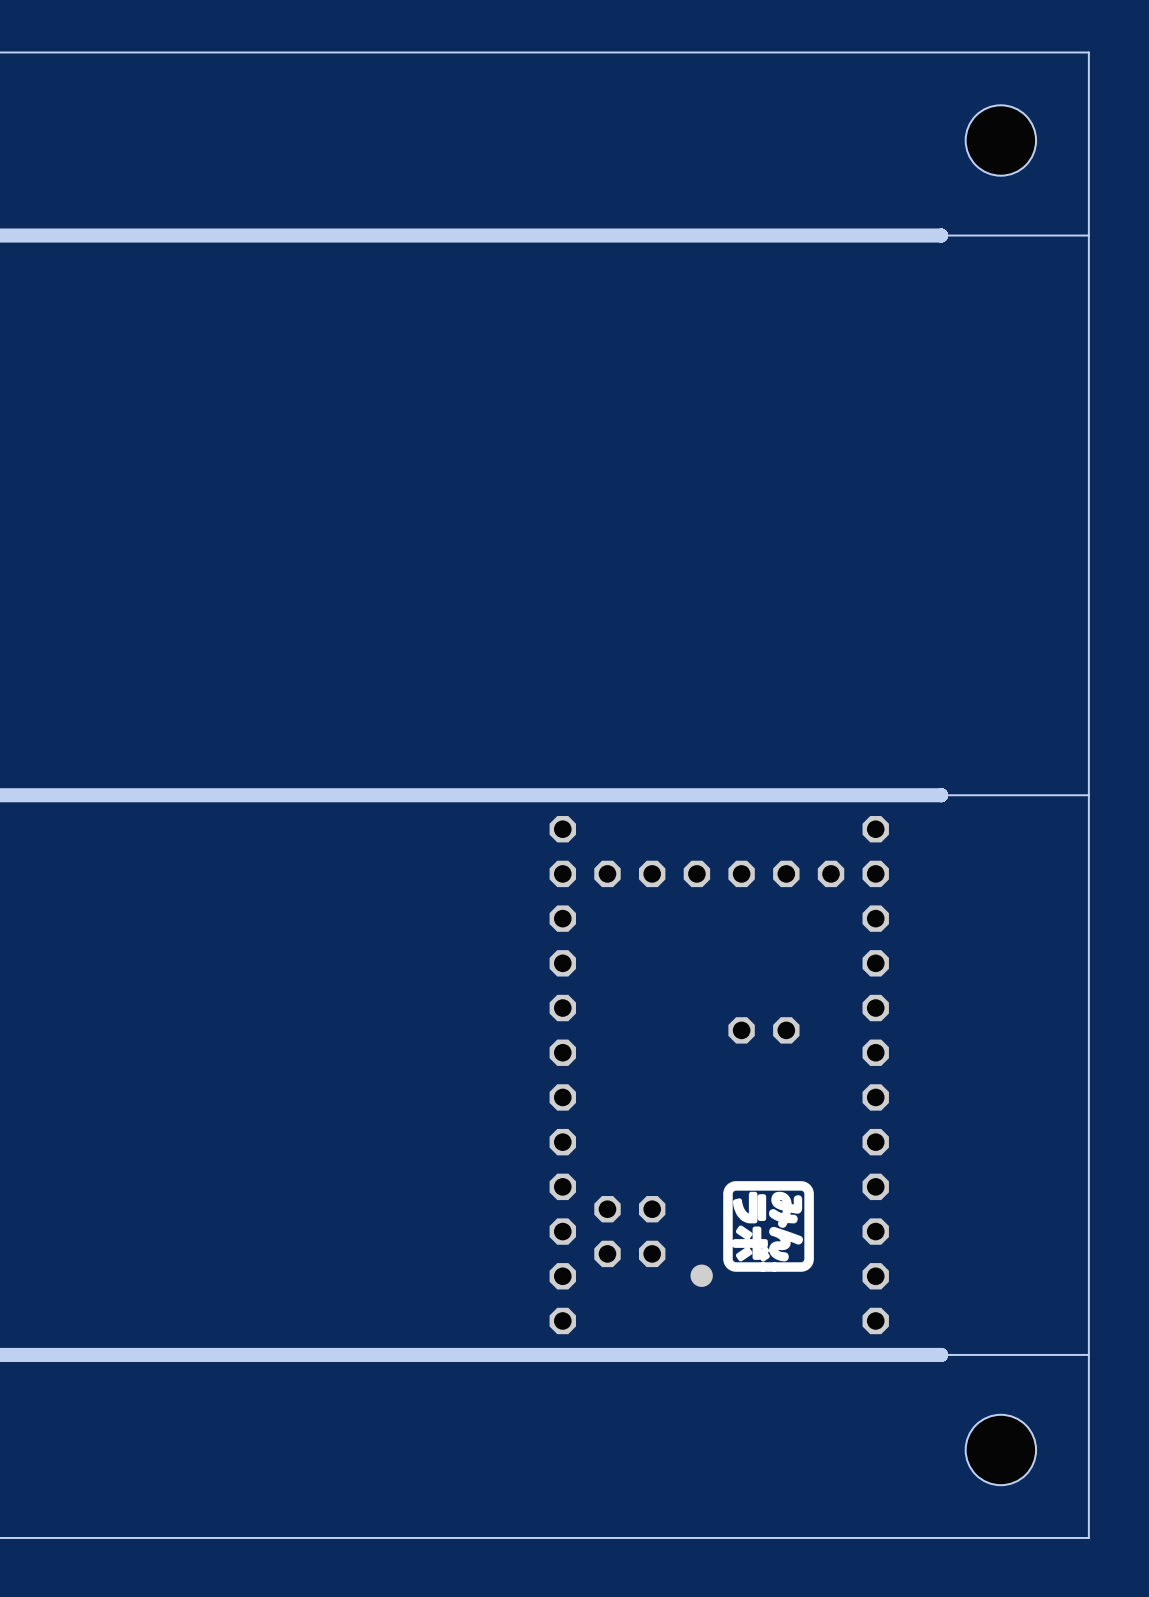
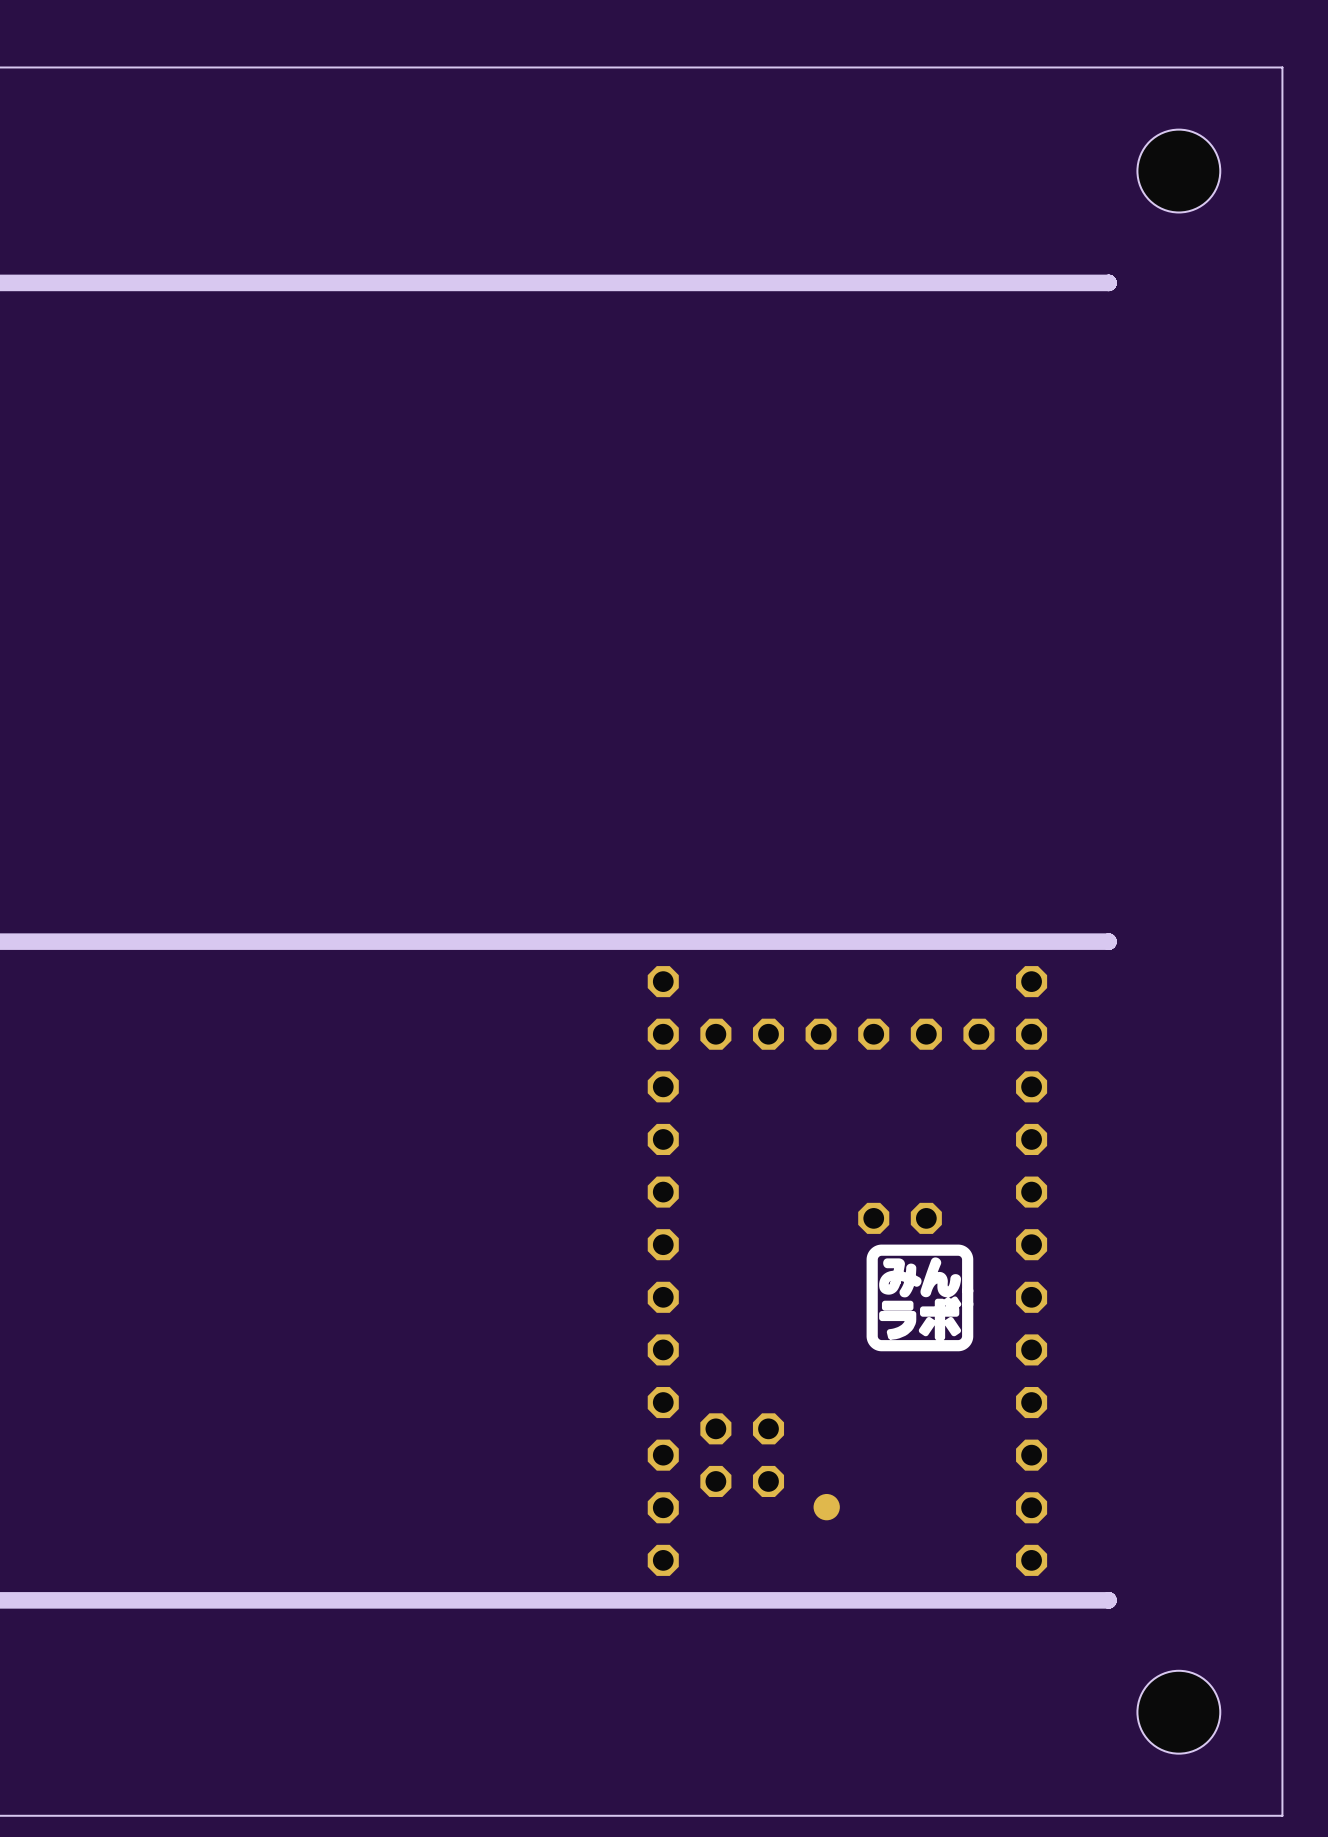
board edge: (1088, 235) (905, 235) -> none
board edge: (1088, 795) (905, 795) -> none
drawing: none -> [866, 1244, 974, 1352]
drawing: [723, 1181, 814, 1272] -> none
board edge: (1088, 1354) (905, 1354) -> none

